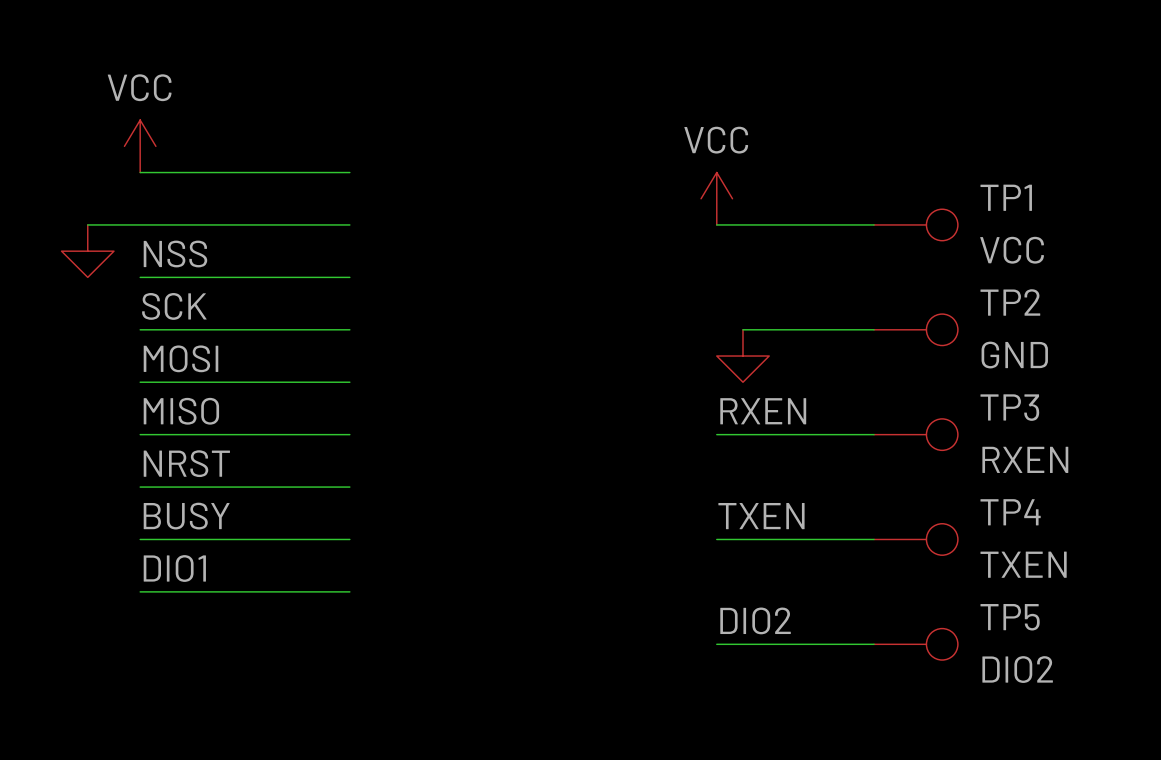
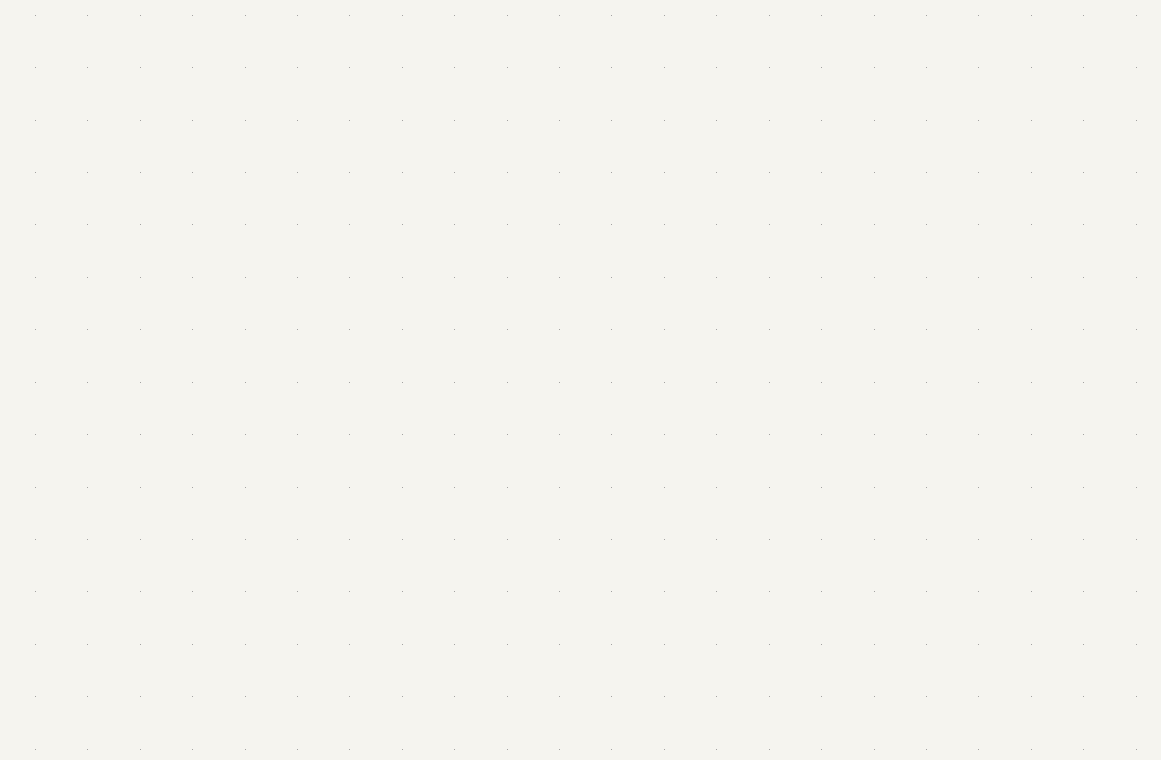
power symbol: VCC (140, 146) -> none
wire: (140, 172) (349, 172) -> none
power symbol: VCC (716, 198) -> none
wire: (87, 224) (349, 224) -> none
wire: (716, 224) (874, 224) -> none
TP1: VCC (915, 224) -> none
power symbol: (87, 251) -> none
label: NSS (175, 253) -> none
wire: (140, 277) (349, 277) -> none
label: SCK (174, 306) -> none
wire: (140, 329) (349, 329) -> none
wire: (742, 329) (874, 329) -> none
TP2: GND (915, 329) -> none
power symbol: (742, 356) -> none
label: MOSI (180, 358) -> none
wire: (140, 382) (349, 382) -> none
label: MISO (181, 411) -> none
label: RXEN (763, 411) -> none
wire: (140, 434) (349, 434) -> none
wire: (716, 434) (874, 434) -> none
TP3: RXEN (915, 434) -> none
label: NRST (186, 463) -> none
wire: (140, 487) (349, 487) -> none
label: BUSY (186, 516) -> none
label: TXEN (761, 516) -> none
wire: (140, 539) (349, 539) -> none
wire: (716, 539) (874, 539) -> none
TP4: TXEN (915, 539) -> none
label: DIO1 (174, 568) -> none
wire: (140, 591) (349, 591) -> none
label: DIO2 (755, 620) -> none
wire: (716, 644) (874, 644) -> none
TP5: DIO2 (915, 644) -> none

